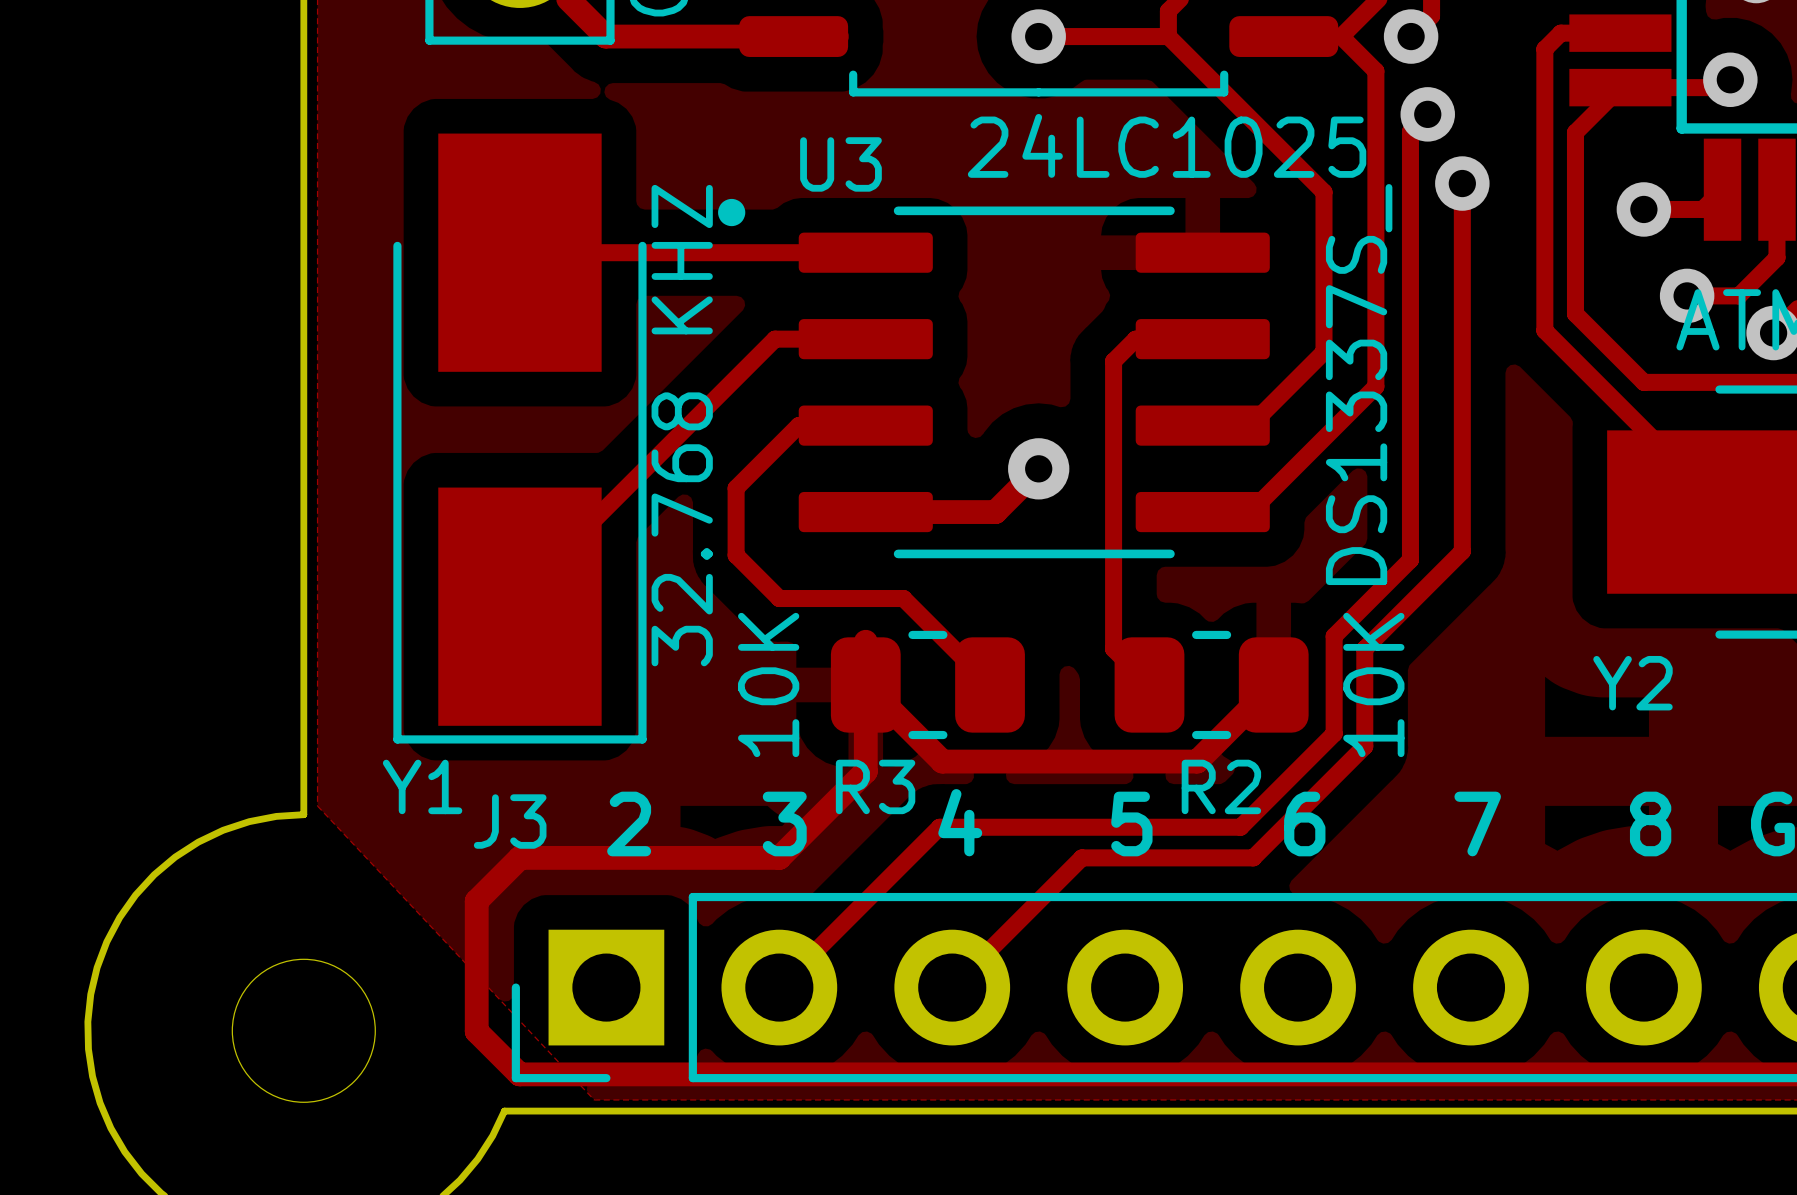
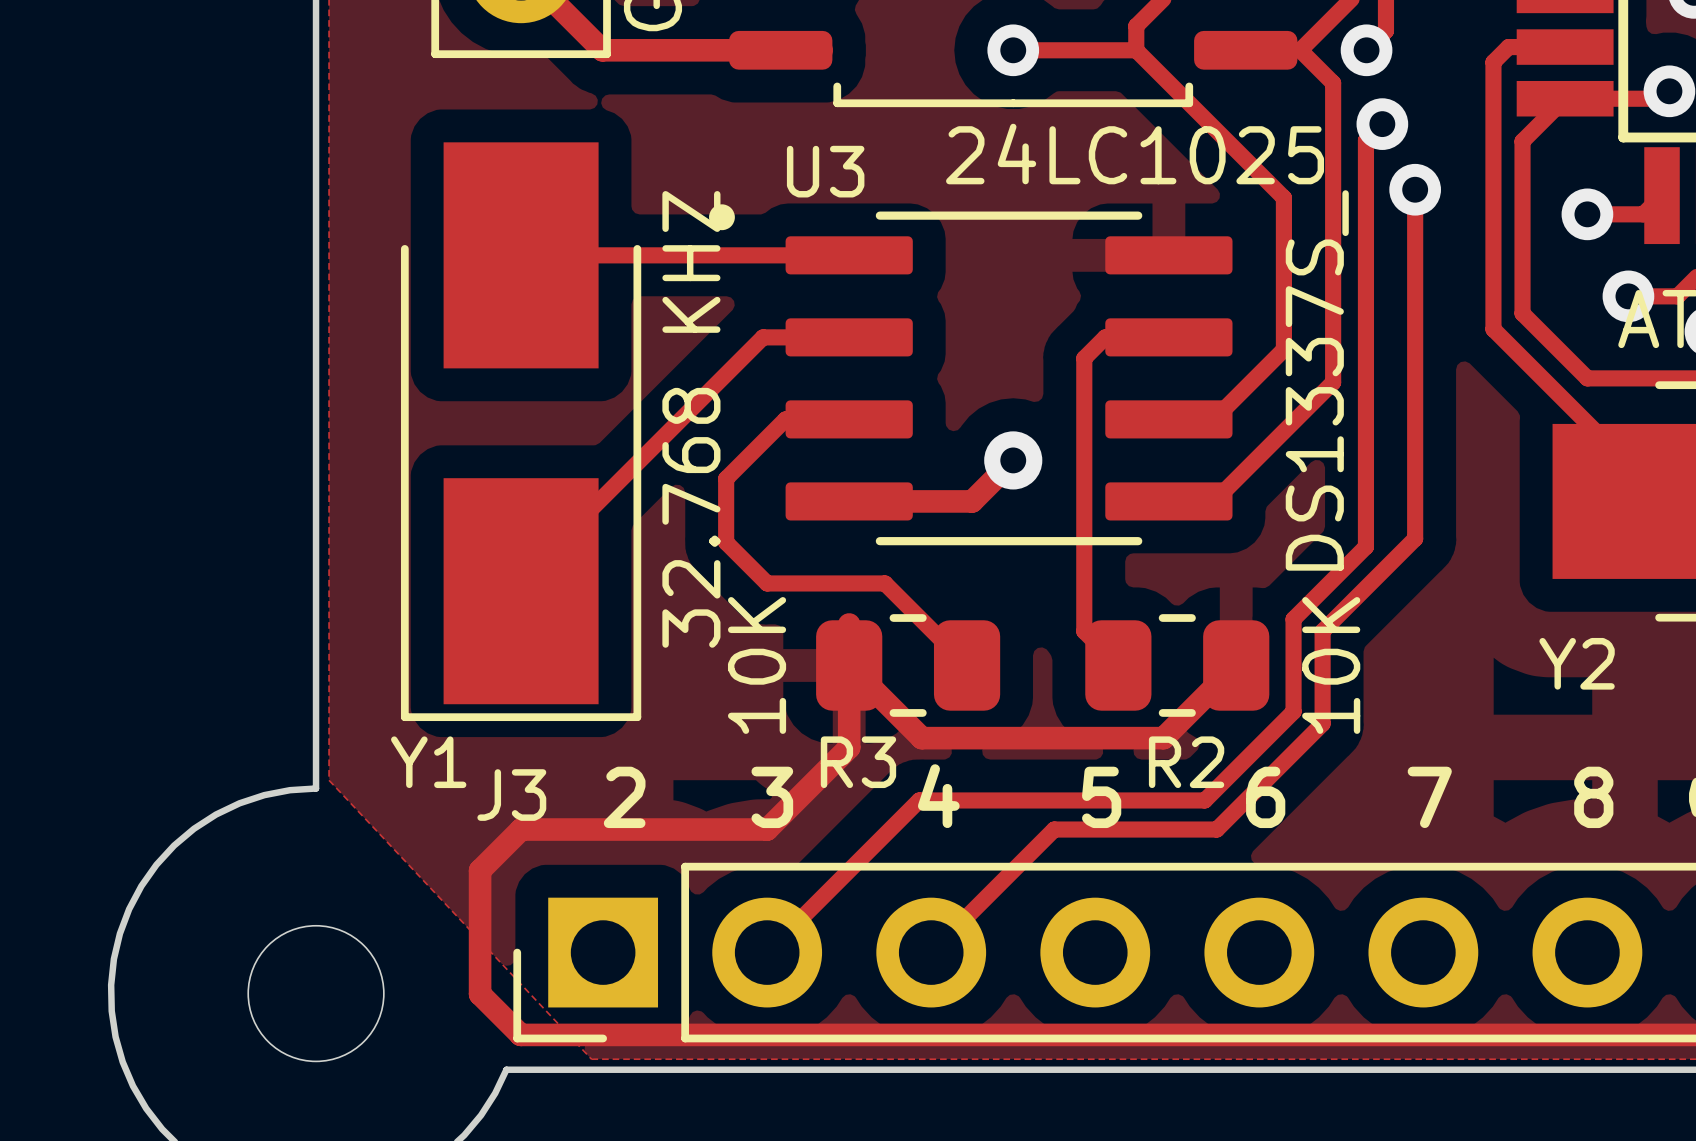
Y1 value position: 32.768 KHZ (682, 425) -> 32.768 KHZ (691, 419)

